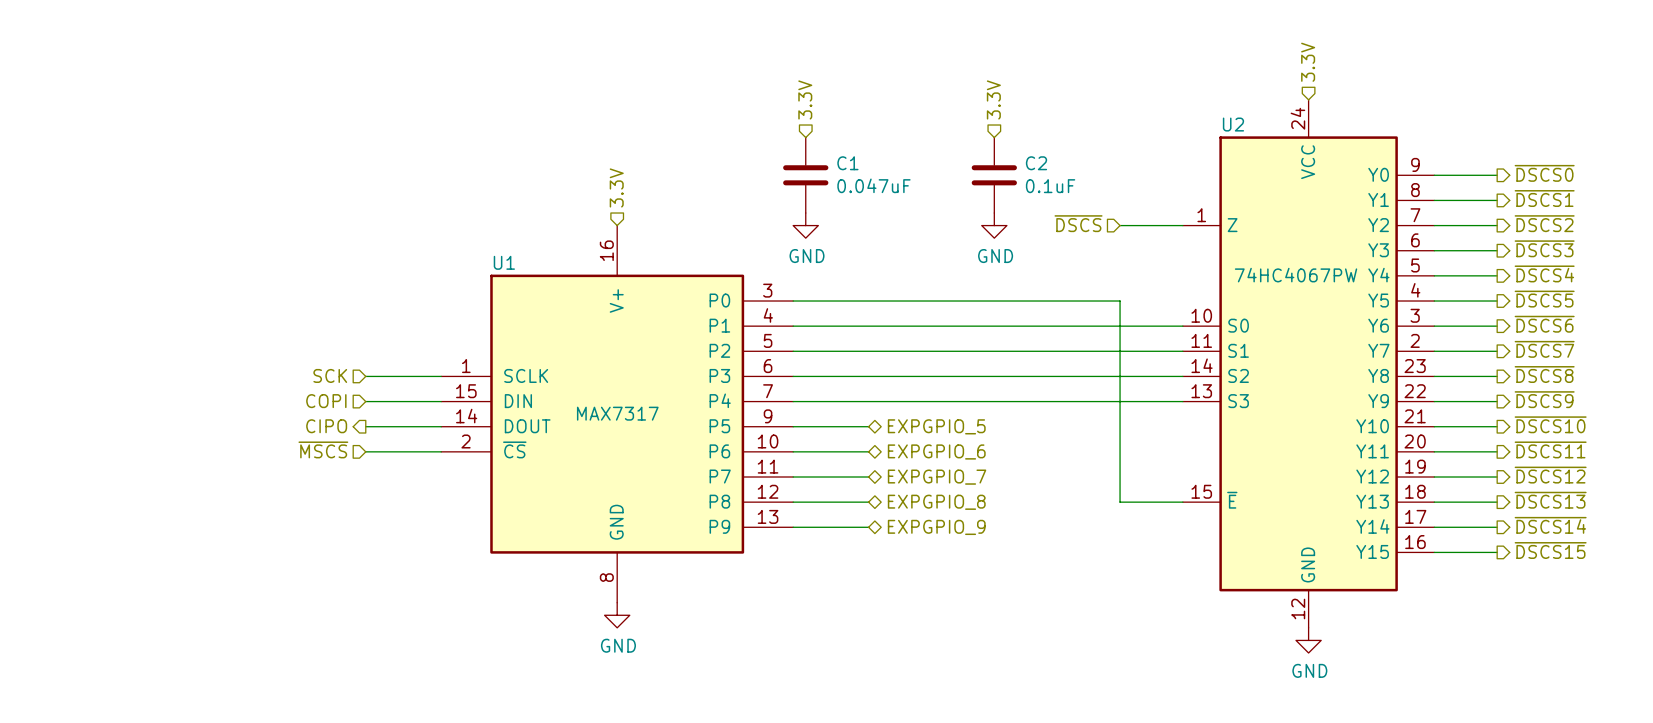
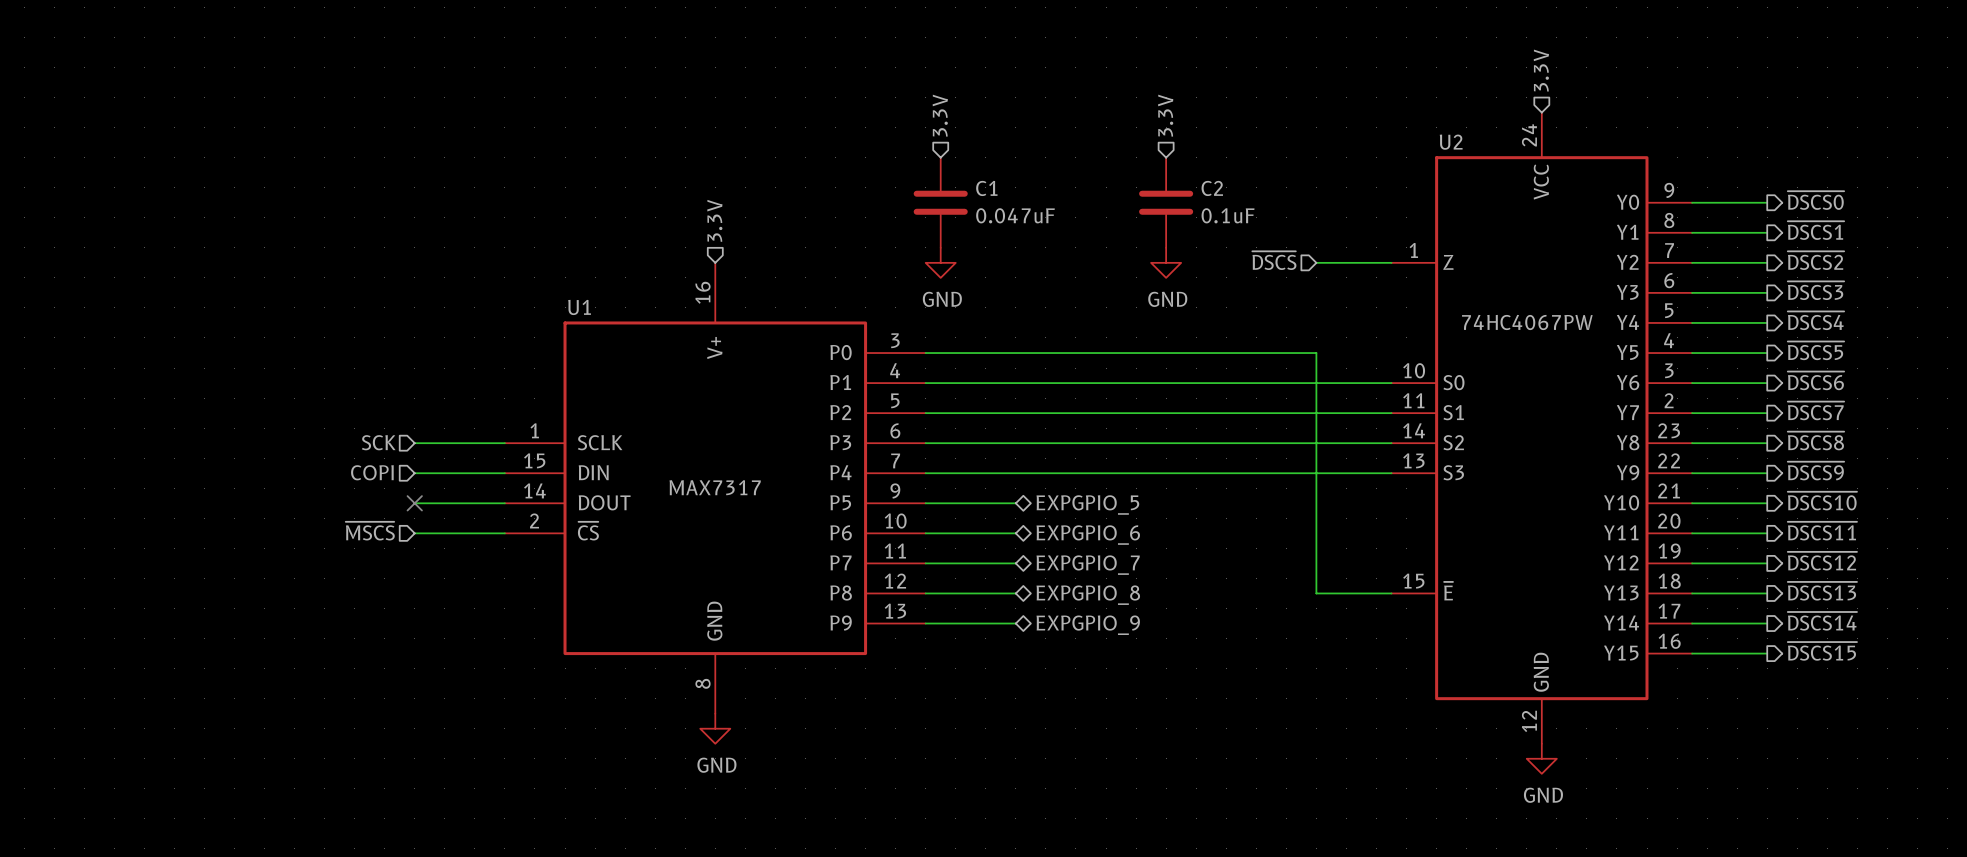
hierarchical label: CIPO (326, 426) -> none
no-connect mark: none -> (414, 503)

